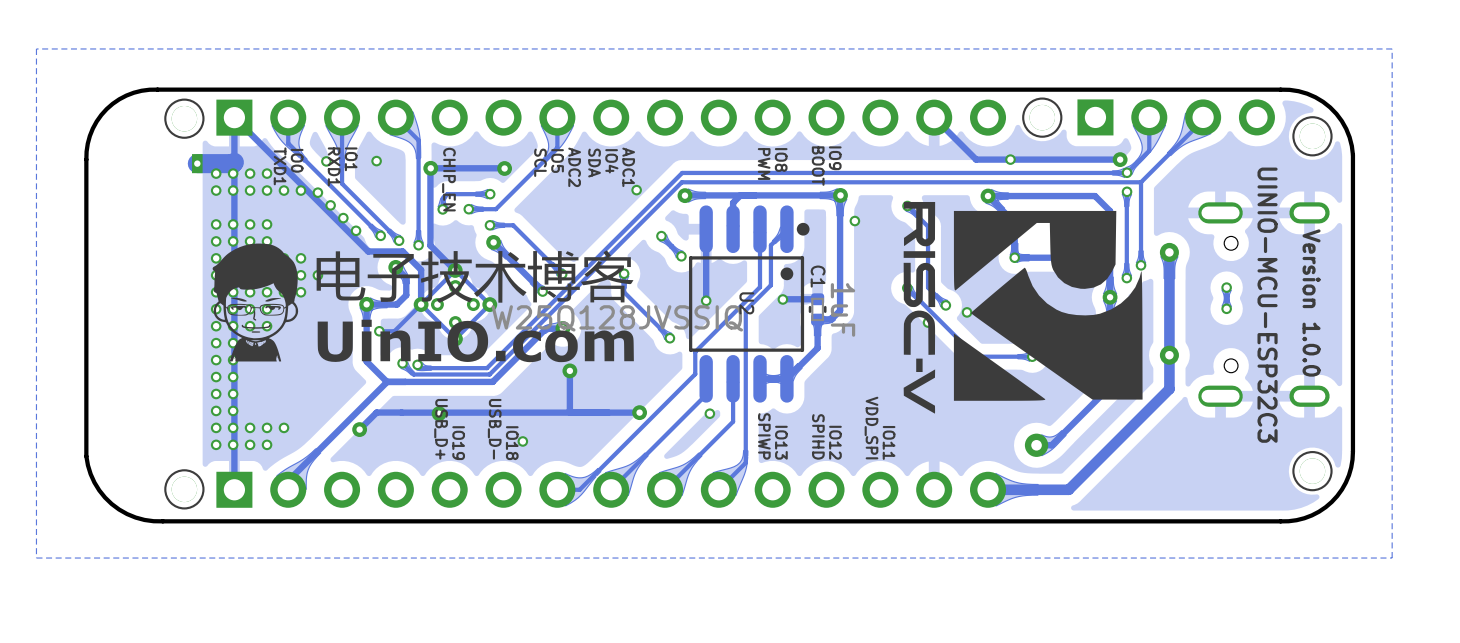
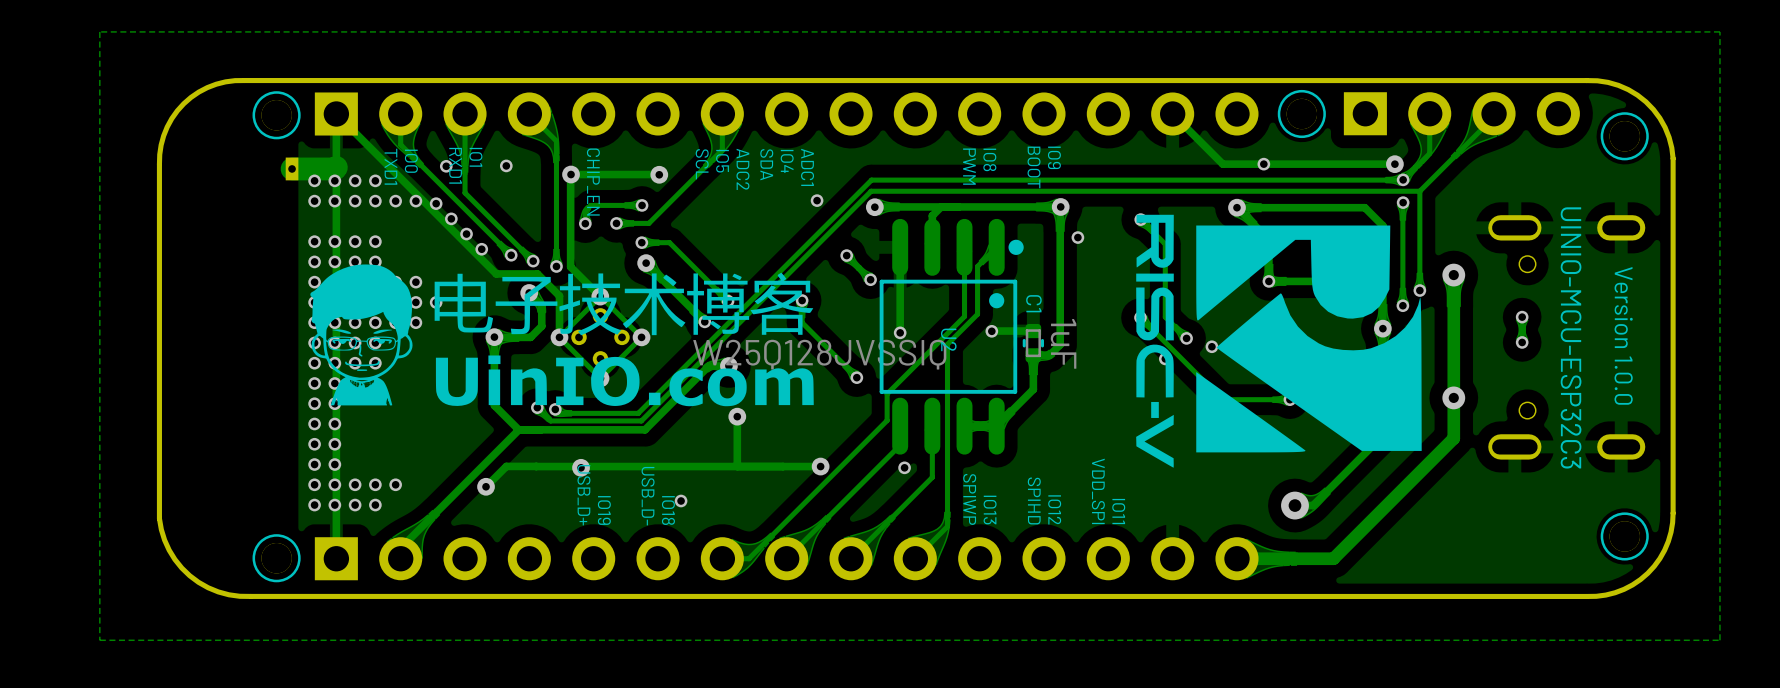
track: (421, 304) (394, 331) (379, 331) -> none
via: (379, 331) -> none

